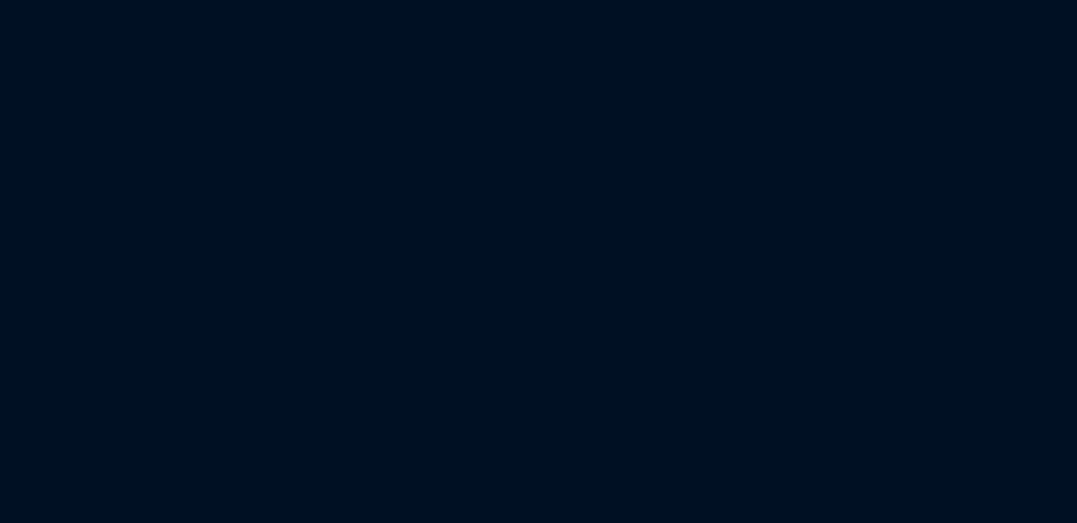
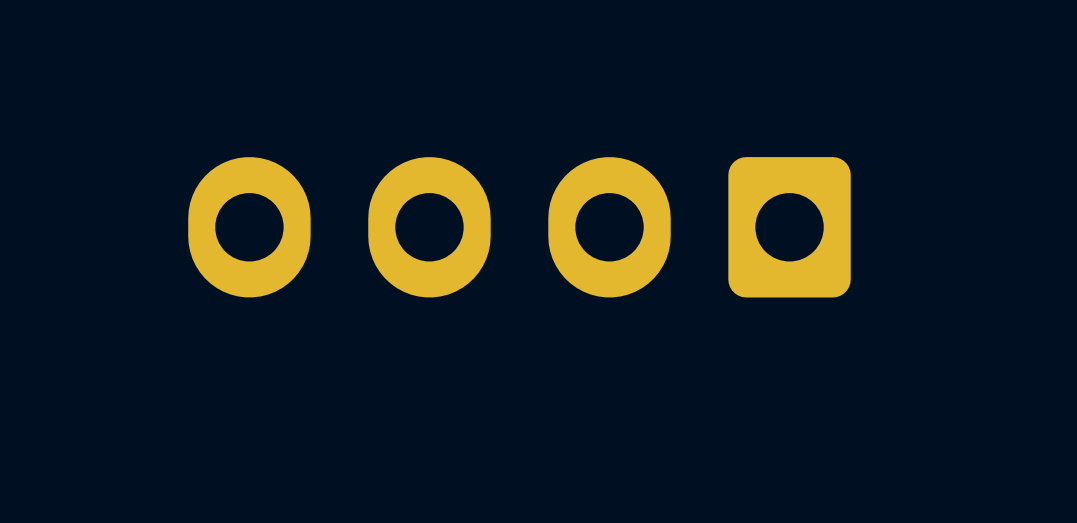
part: none -> (519, 227)

